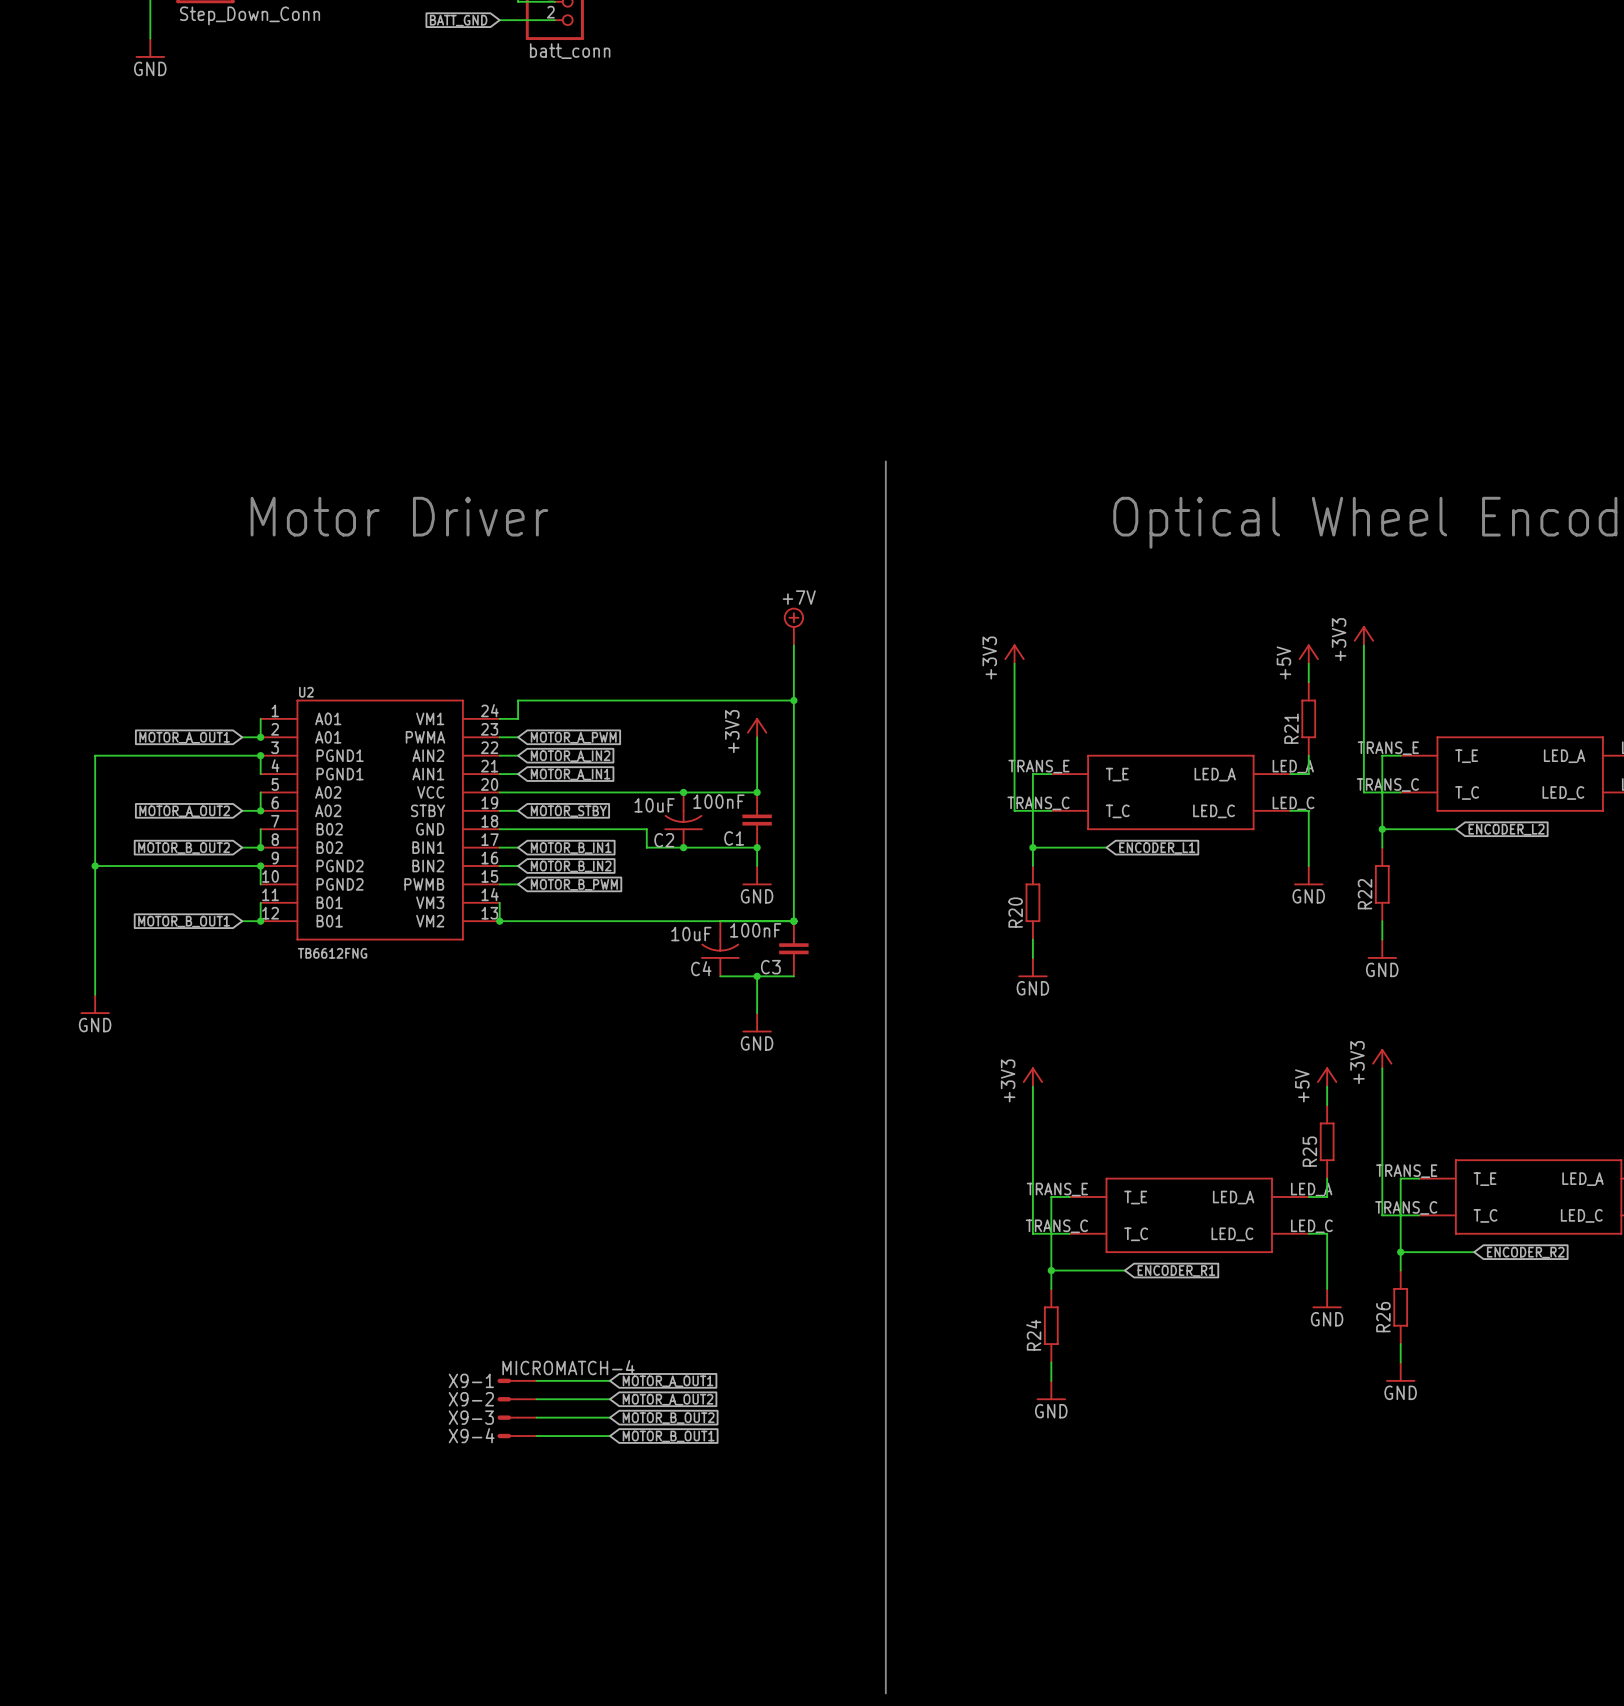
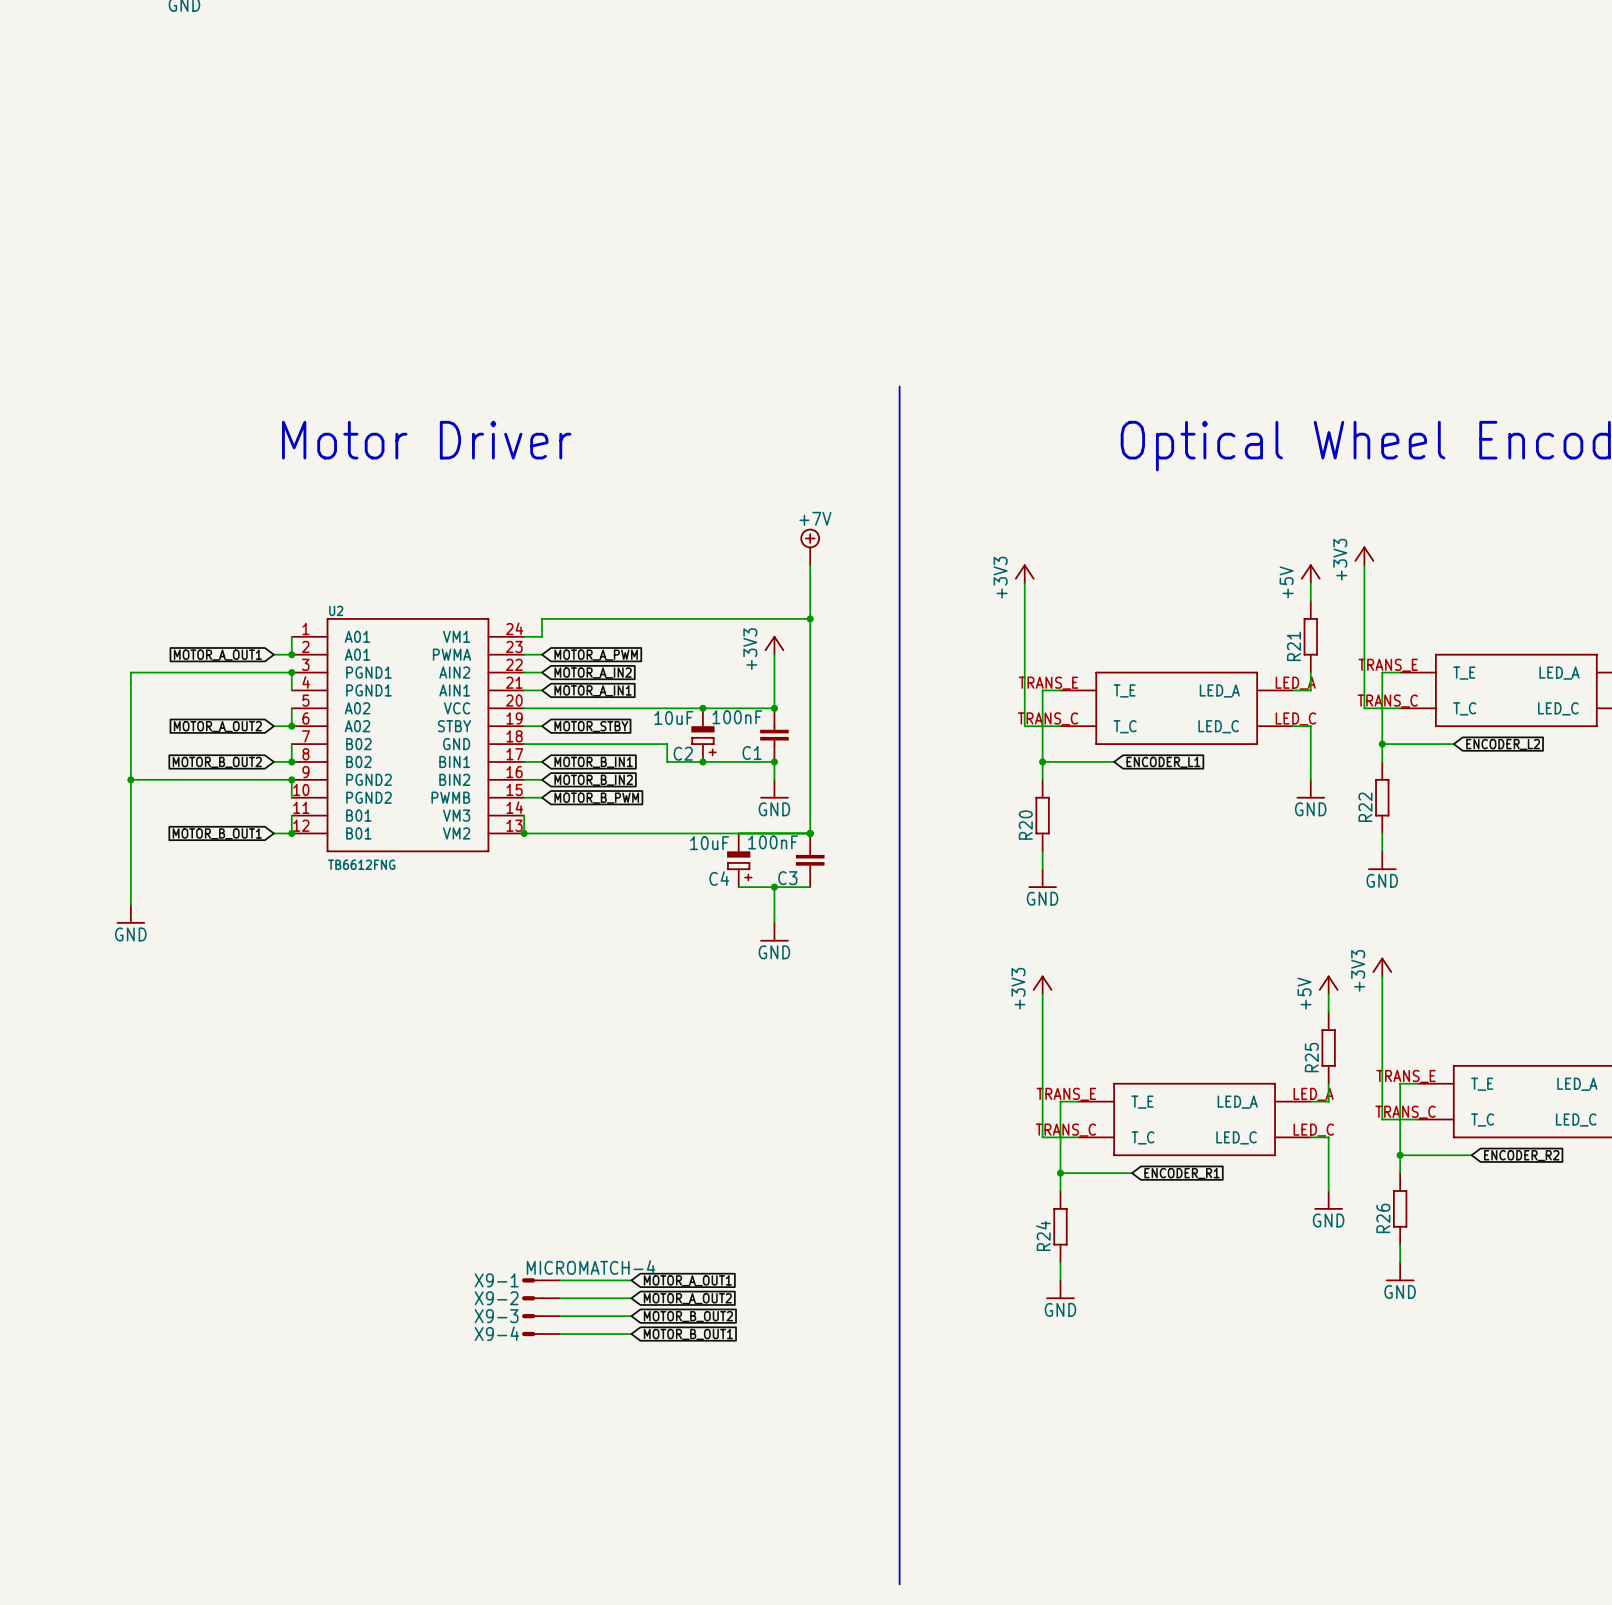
C2 symbol: [664, 792, 703, 848] -> [691, 708, 715, 762]
C4 symbol: [701, 921, 740, 977] -> [727, 833, 751, 888]

